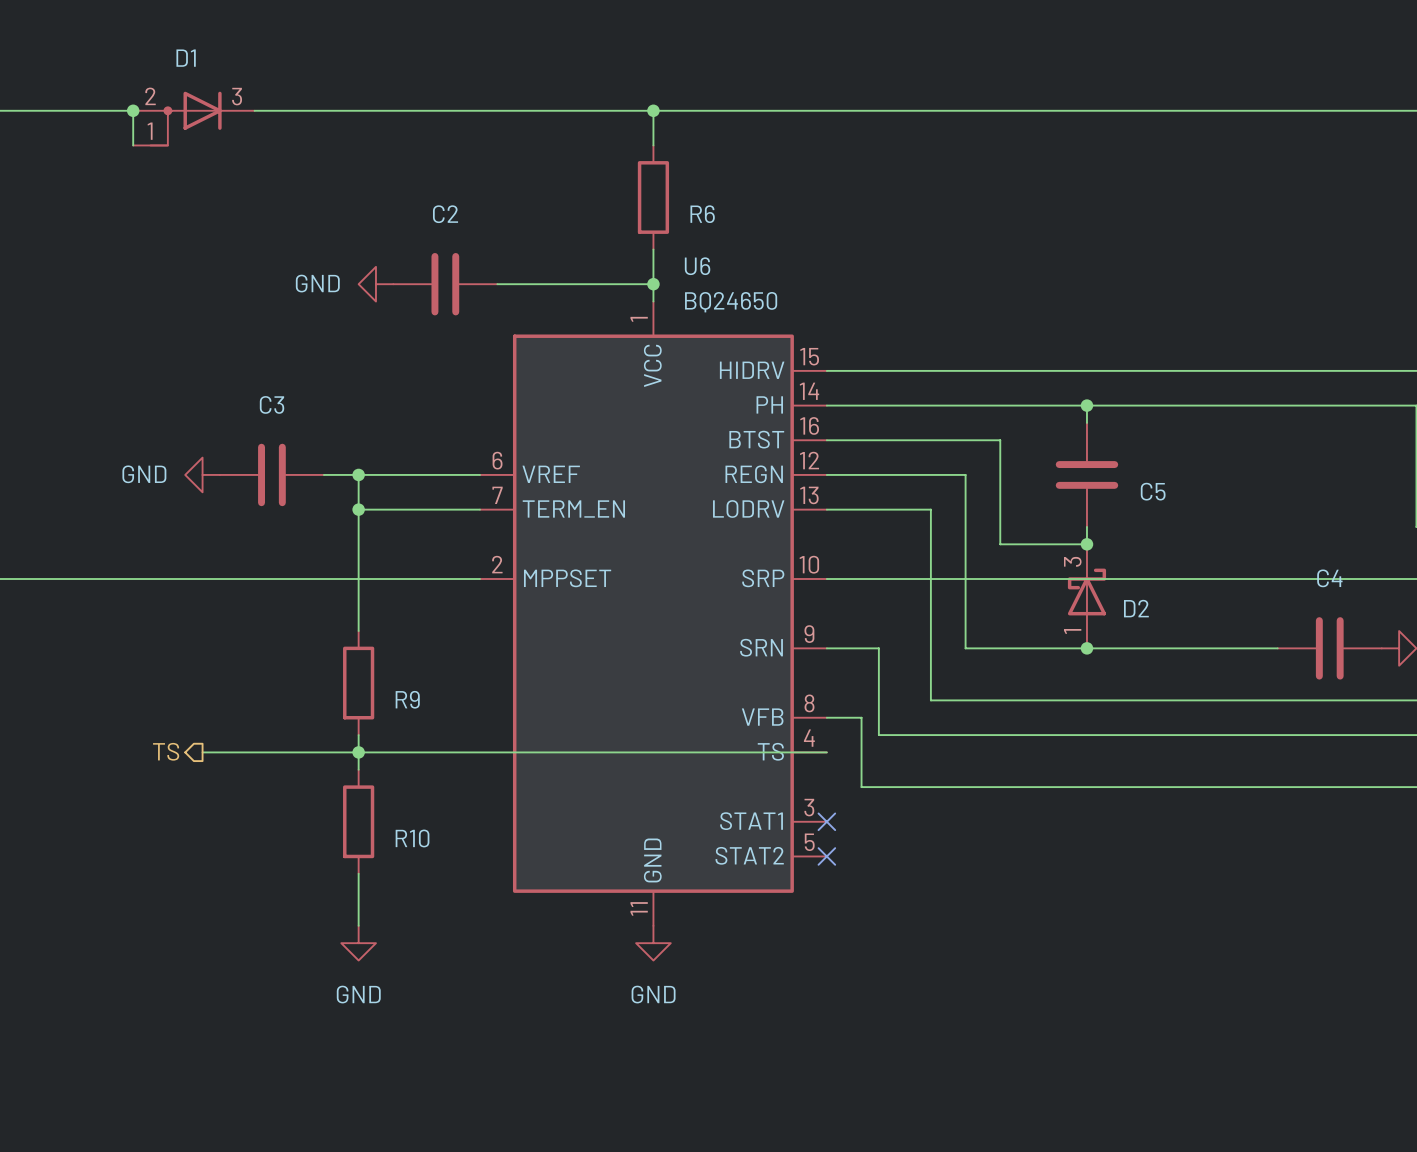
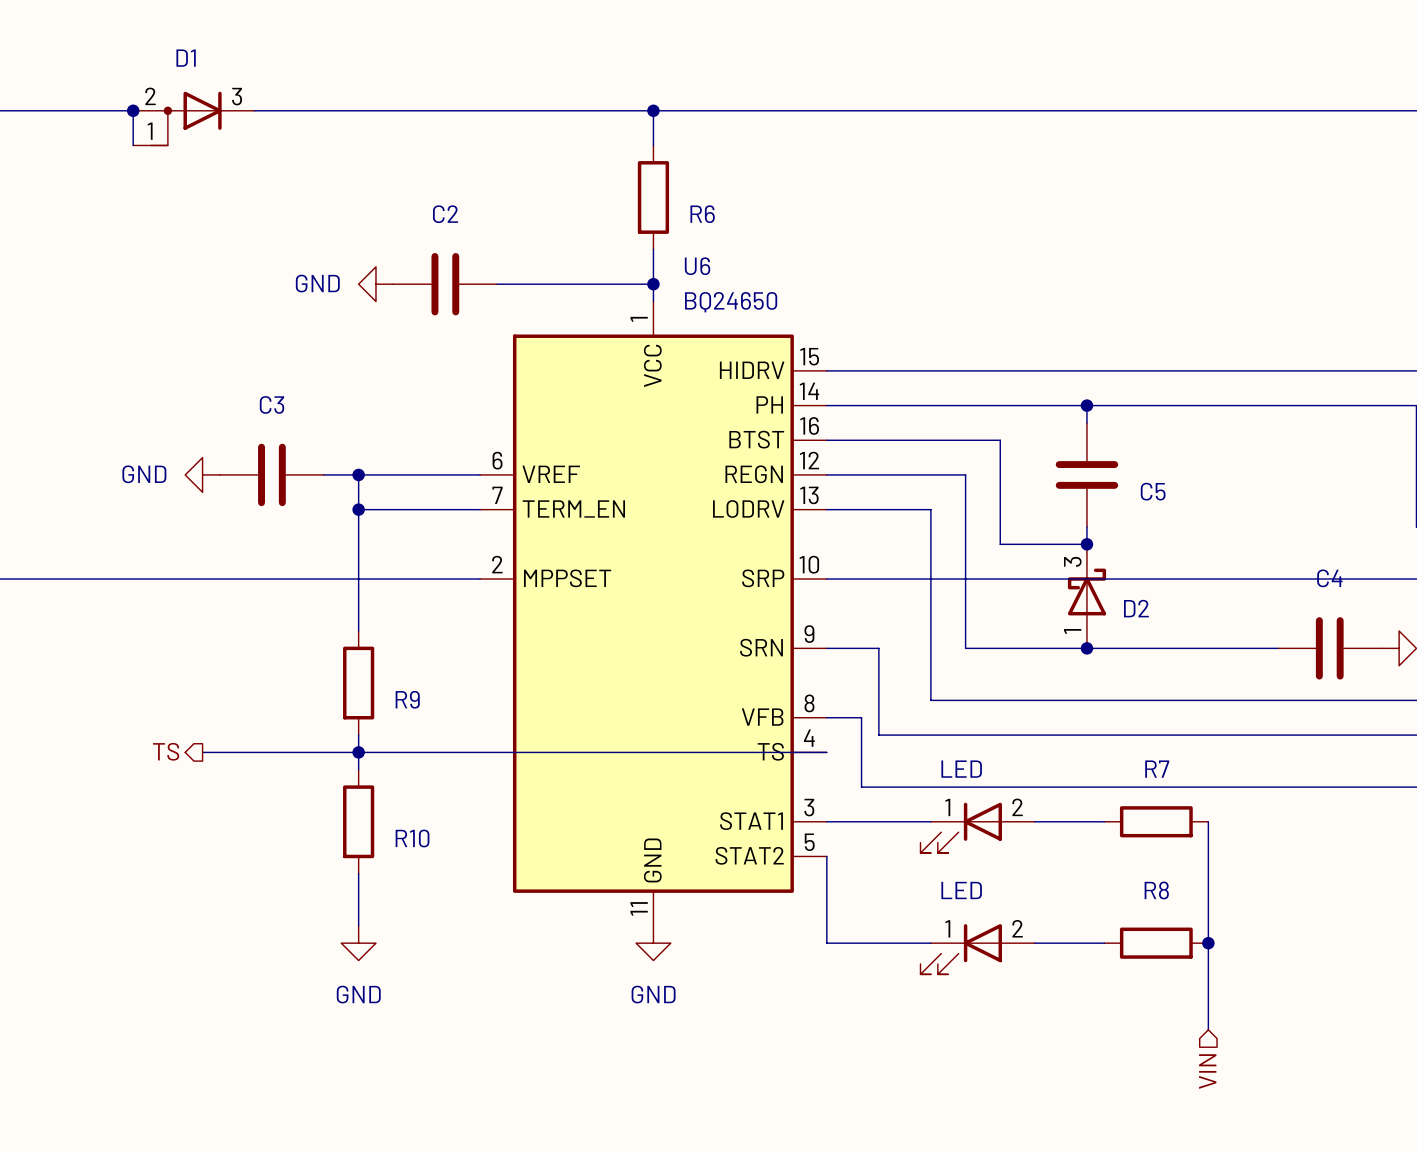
wire: none -> (826, 821) (930, 821)
no-connect mark: (826, 821) -> none
wire: none -> (1034, 821) (1104, 821)
part: none -> R7 (1156, 821)
wire: none -> (1208, 821) (1208, 1029)
part: none -> LED (977, 827)
wire: none -> (826, 856) (826, 943) (930, 943)
no-connect mark: (826, 856) -> none
wire: none -> (1034, 943) (1104, 943)
part: none -> R8 (1156, 943)
junction: none -> (1208, 943)
part: none -> LED (977, 949)
hierarchical label: none -> VIN (1207, 1071)

